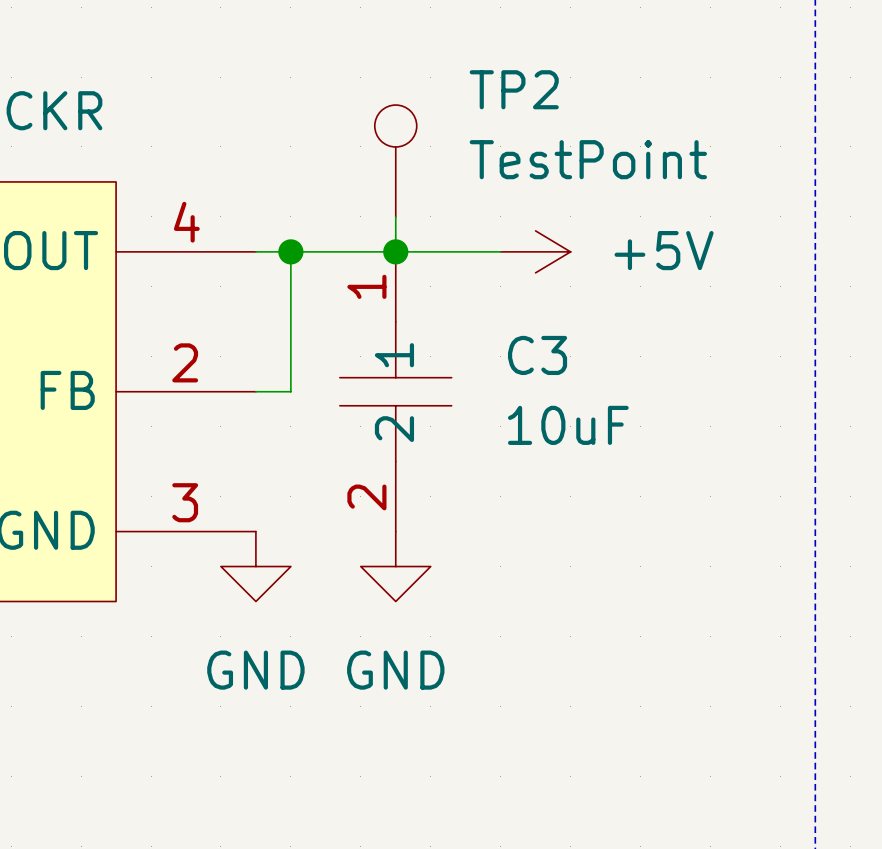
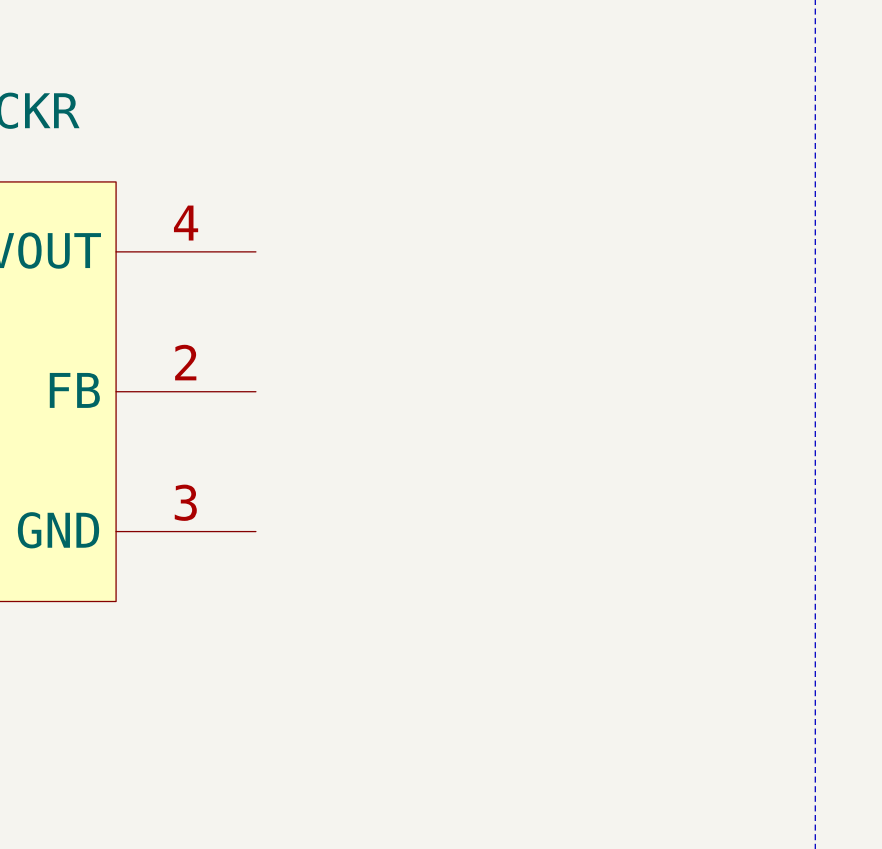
TP2: TestPoint (395, 160) -> none
wire: (395, 216) (395, 251) -> none
wire: (255, 251) (500, 251) -> none
wire: (290, 251) (290, 391) (255, 391) -> none
junction: (290, 251) -> none
junction: (395, 251) -> none
power symbol: +5V (535, 251) -> none
C3: 10uF (395, 391) -> none
power symbol: GND (255, 566) -> none
power symbol: GND (395, 566) -> none

